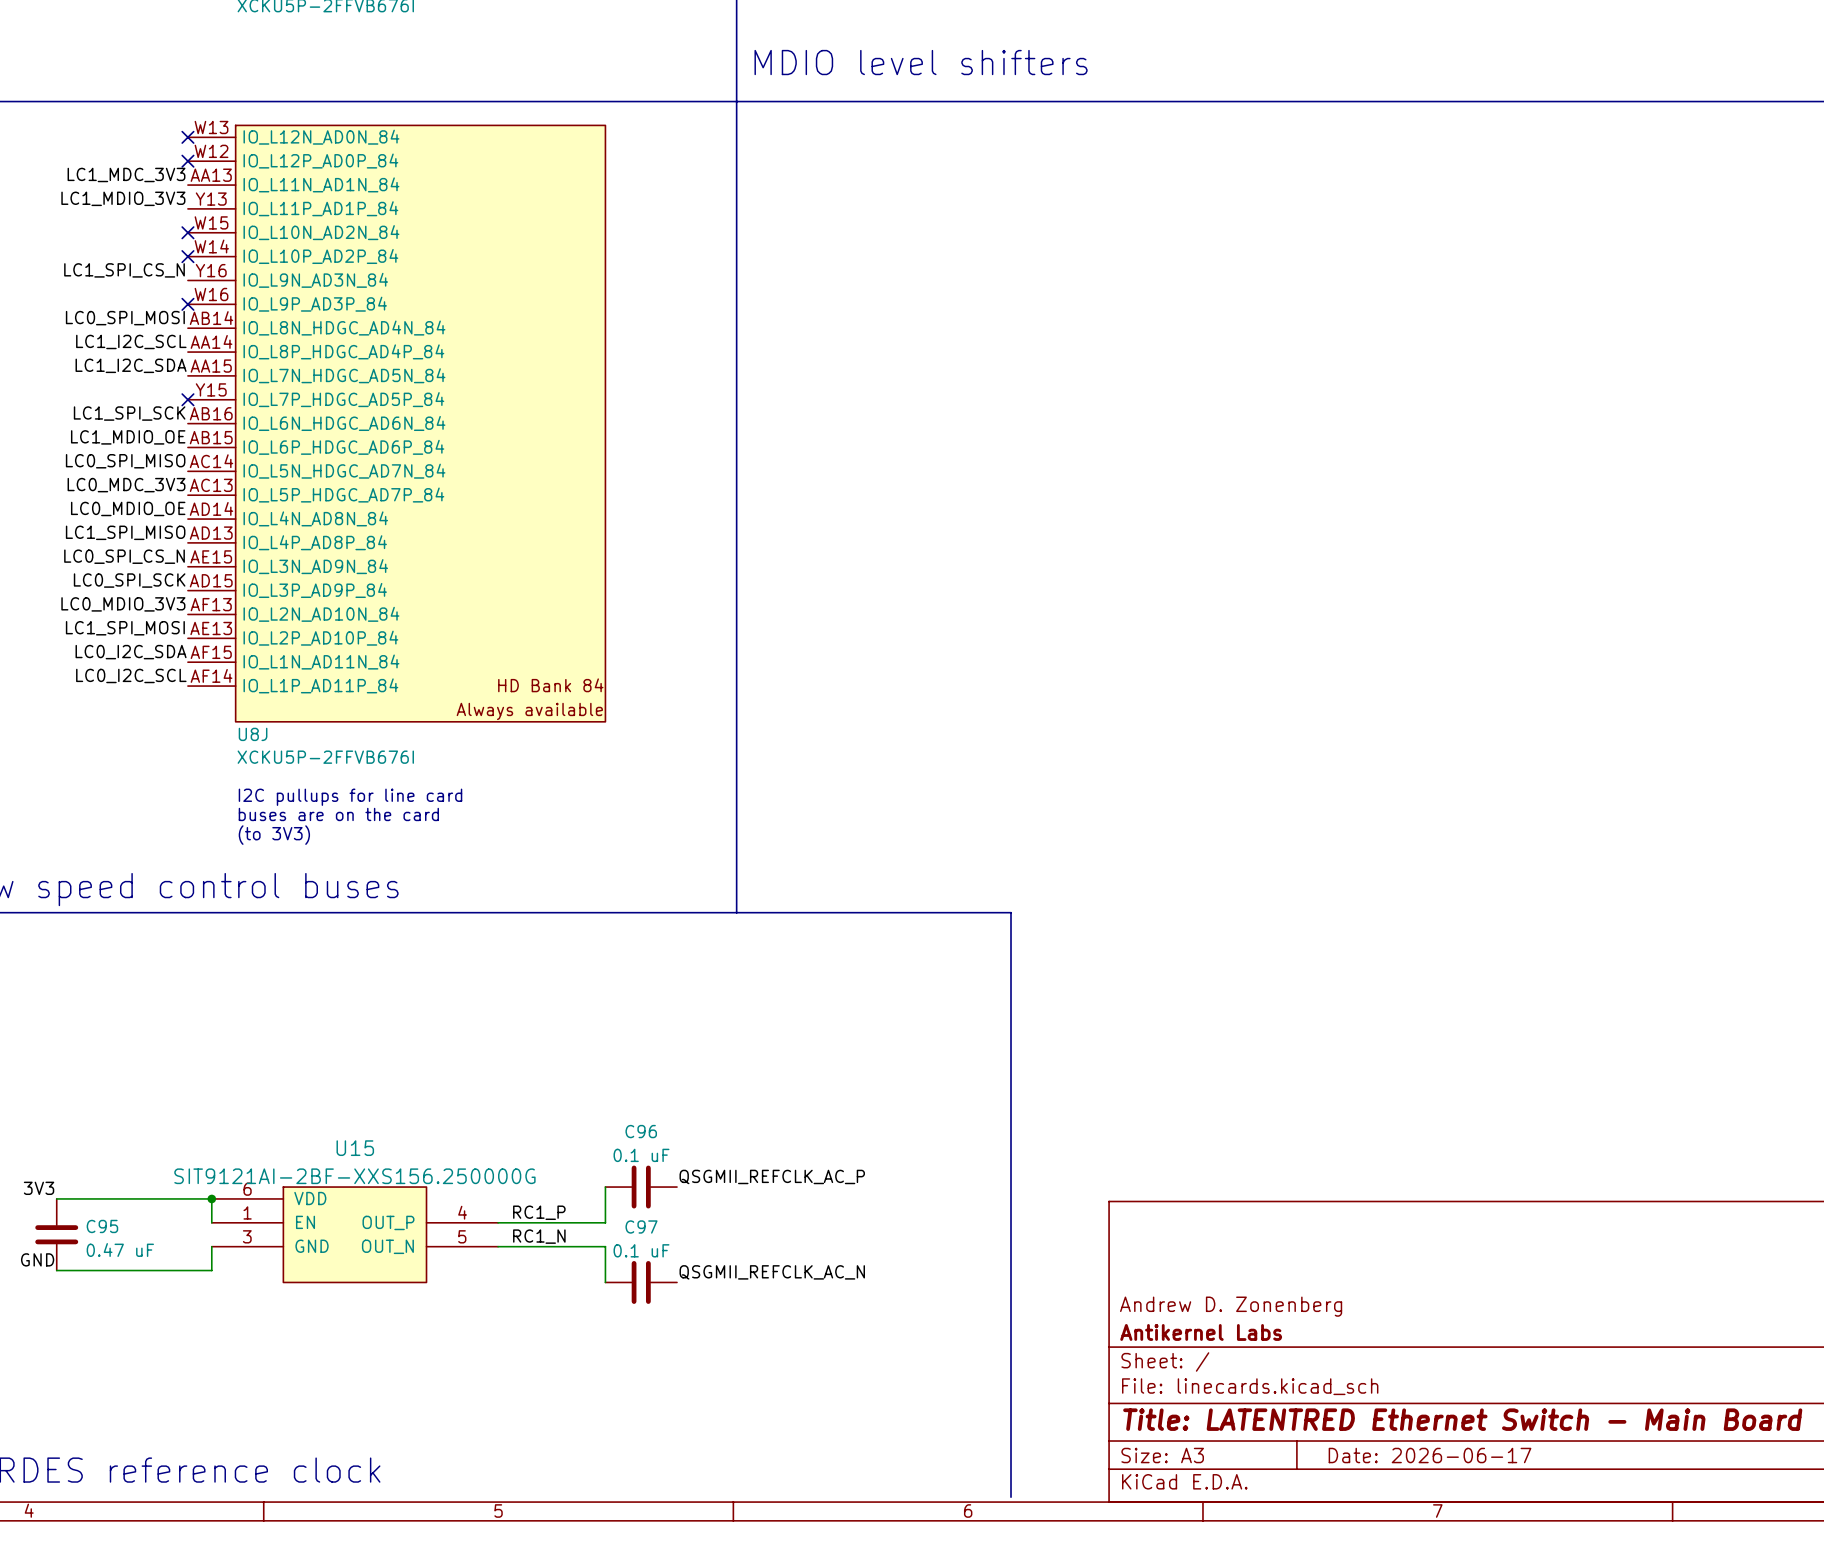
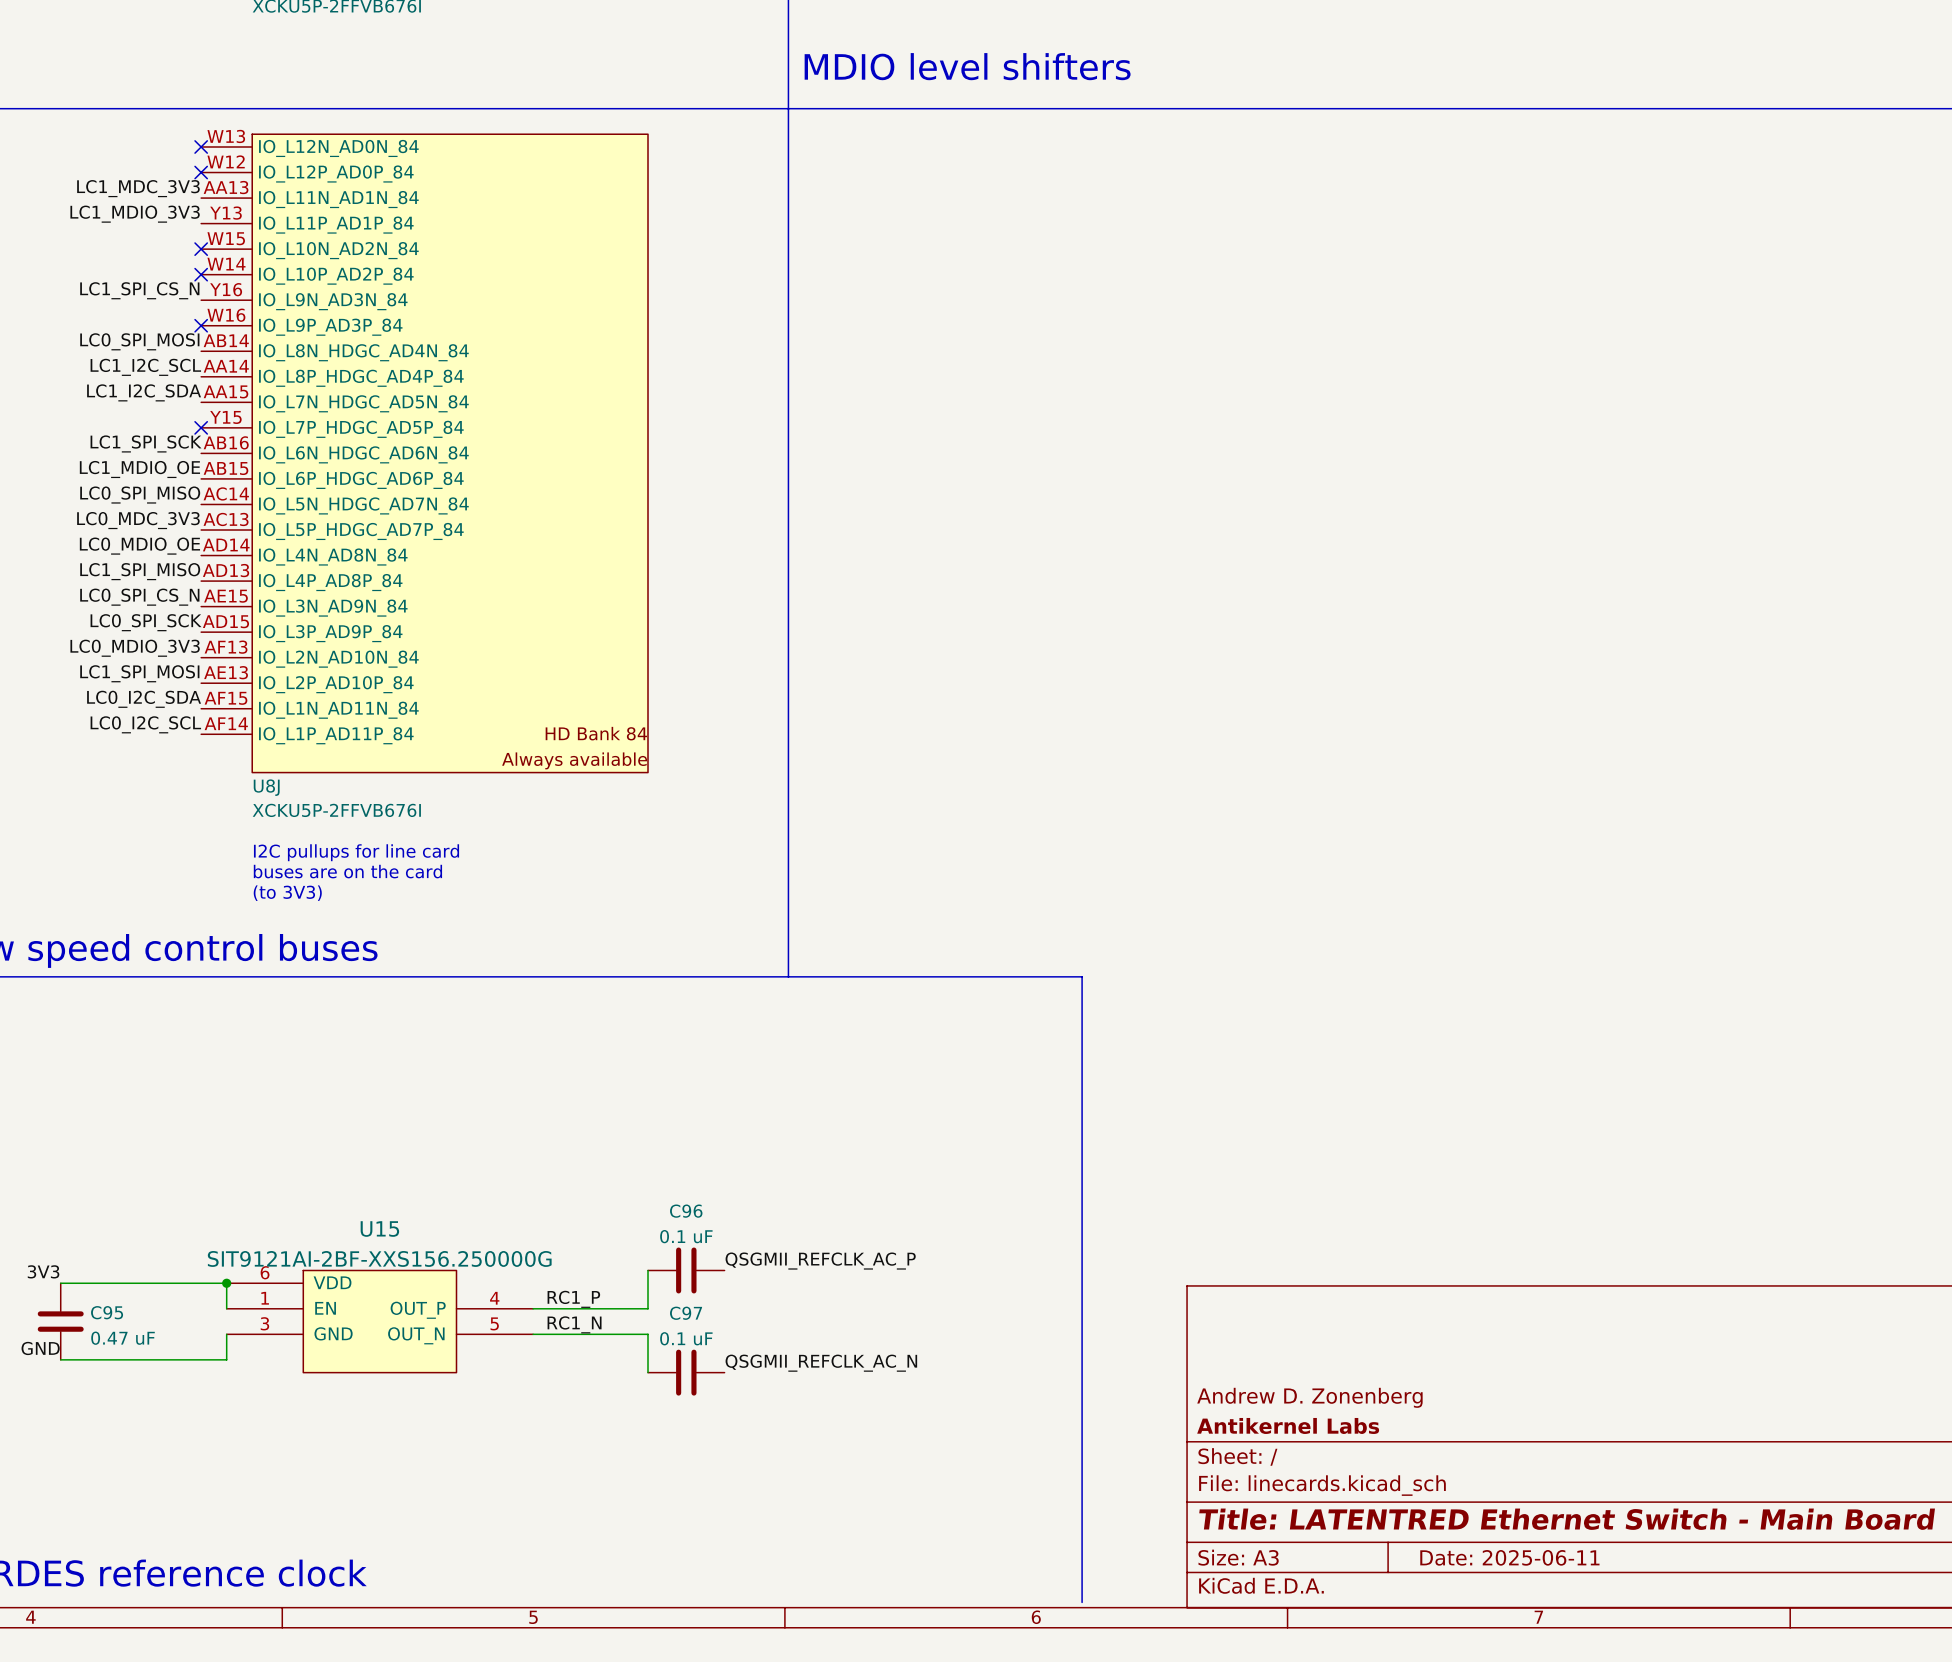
title block: Date: 2026-06-17 (1430, 1455) -> Date: 2025-06-11 (1509, 1557)

